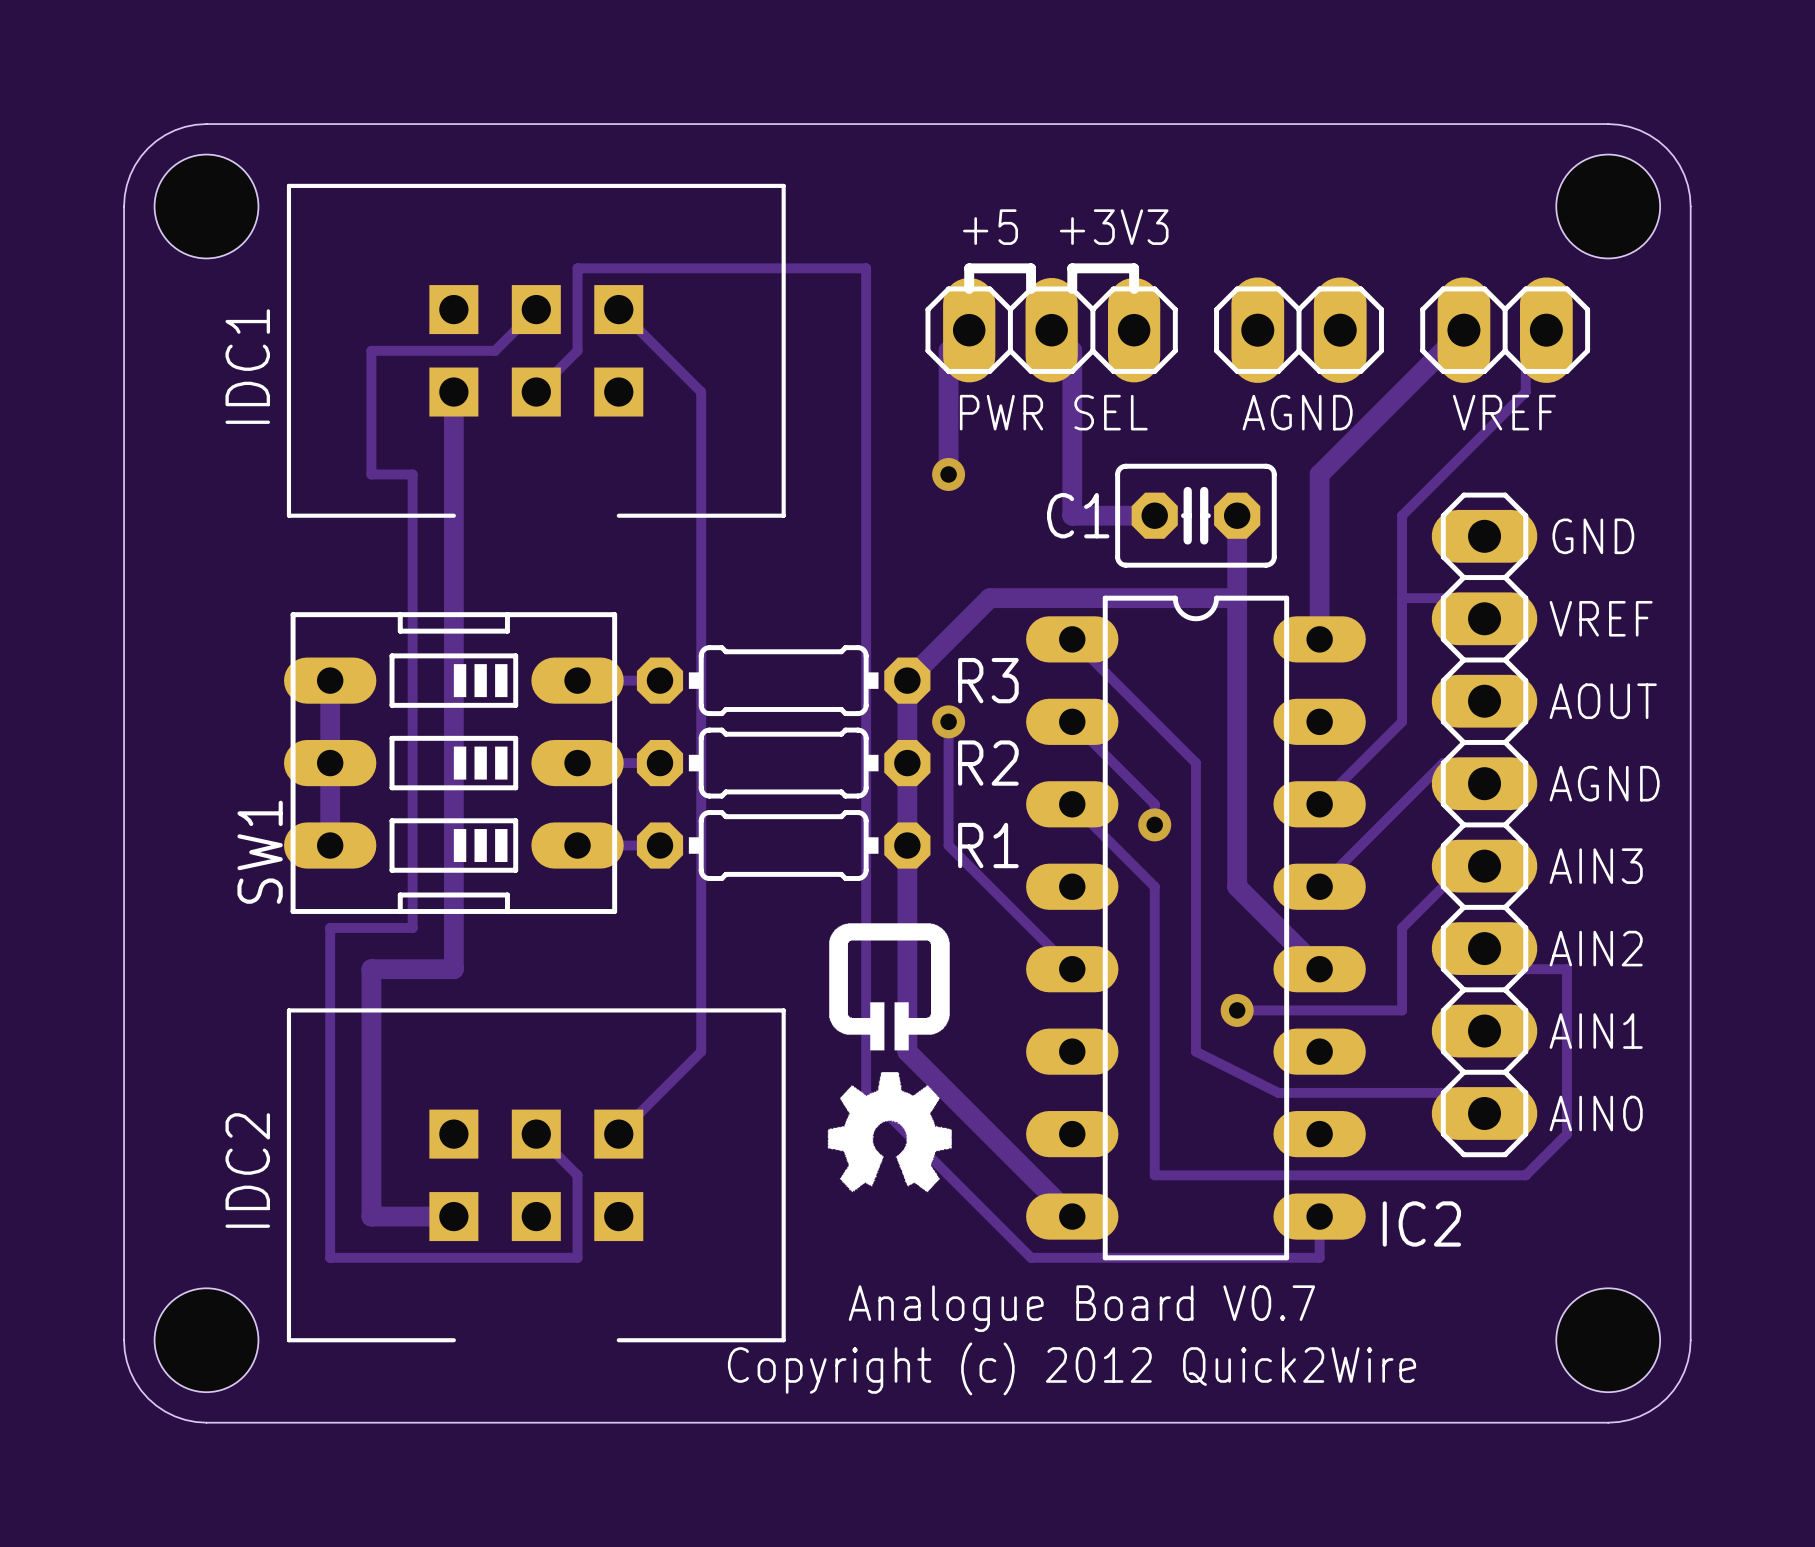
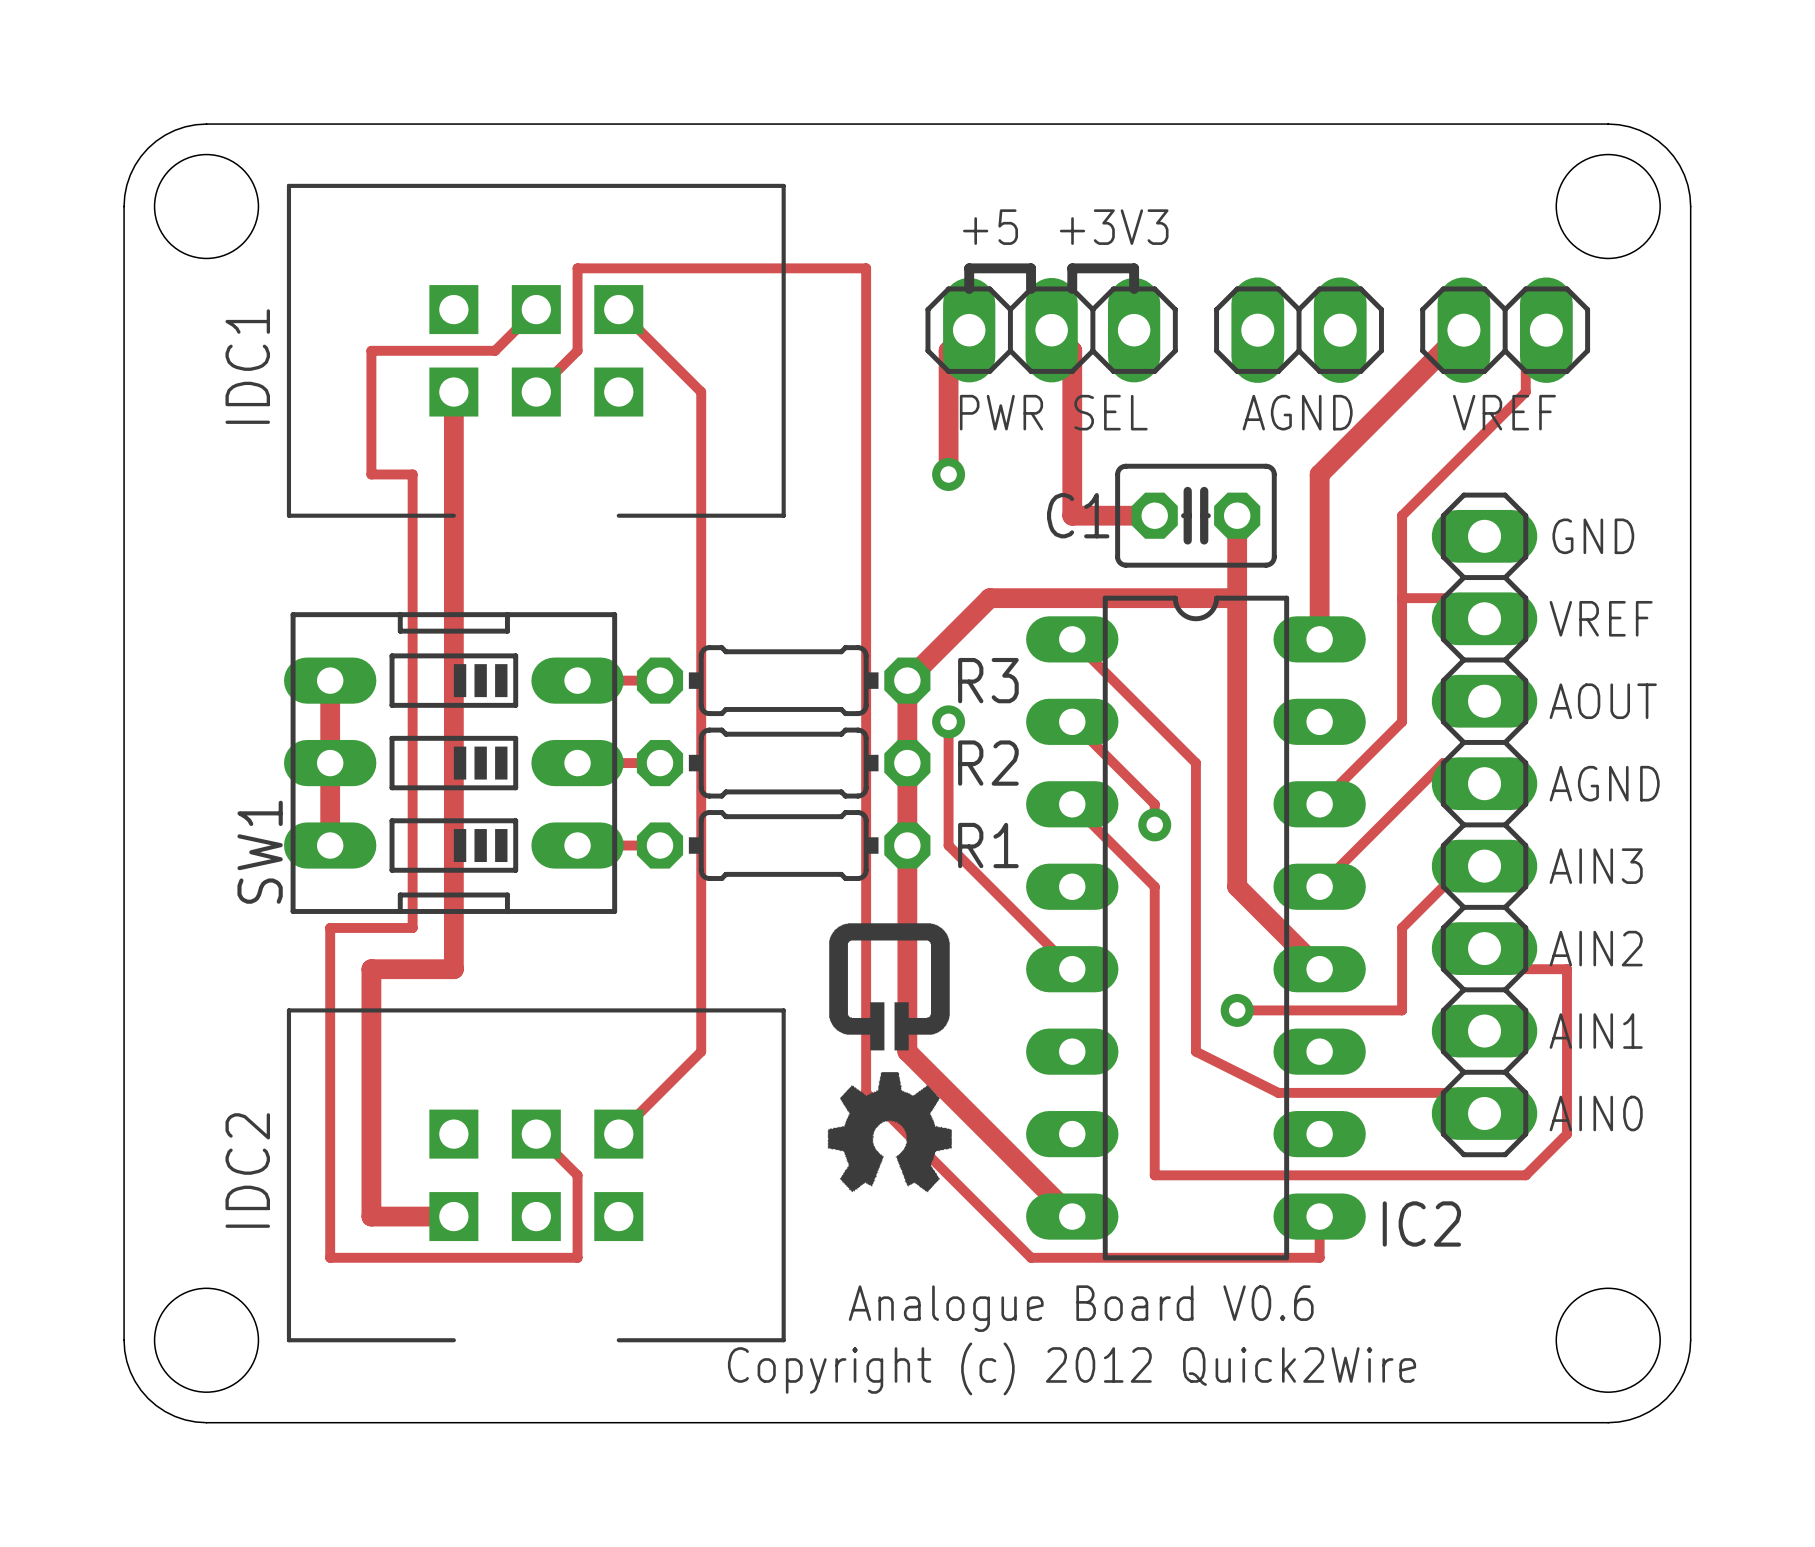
text: Analogue Board V0.7 (1081, 1308) -> Analogue Board V0.6 (1081, 1308)

